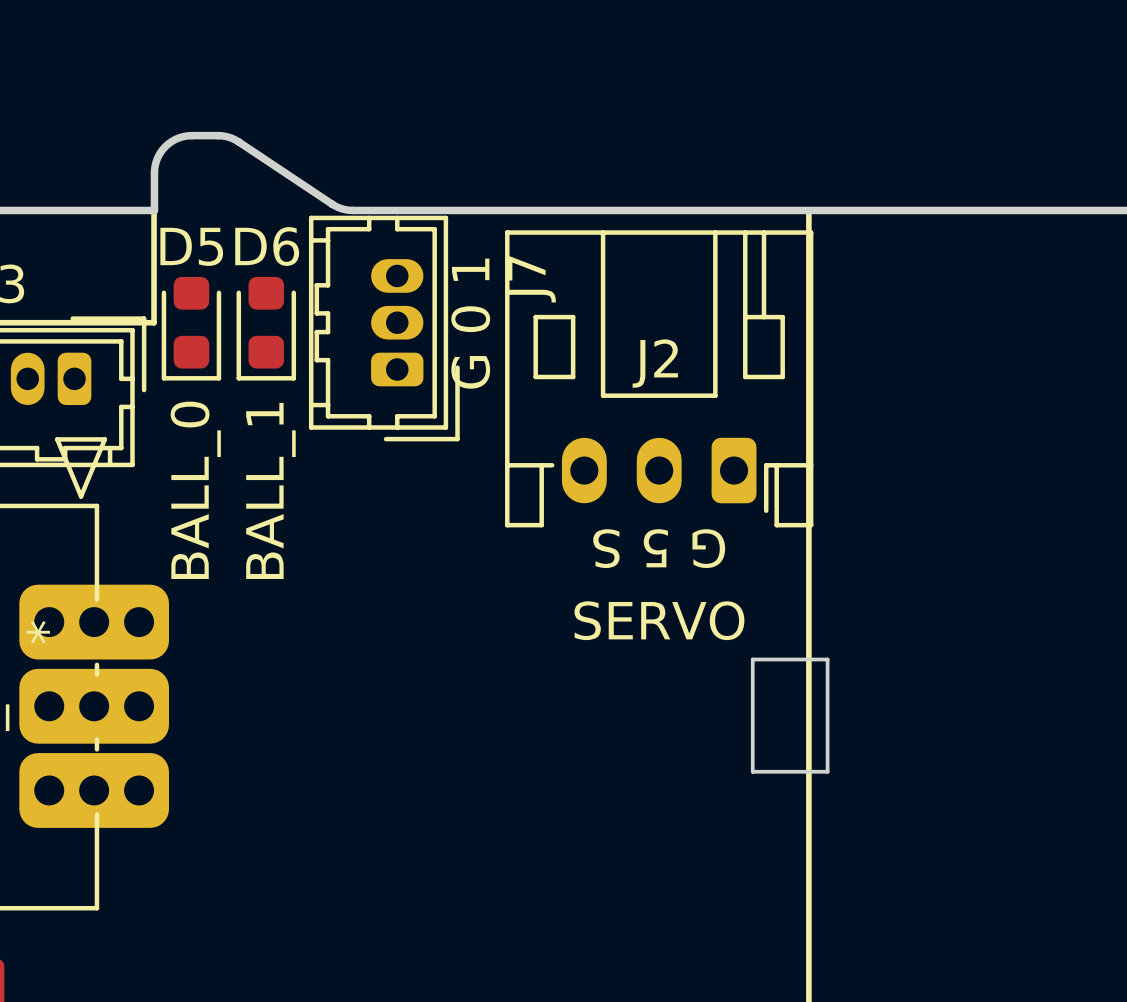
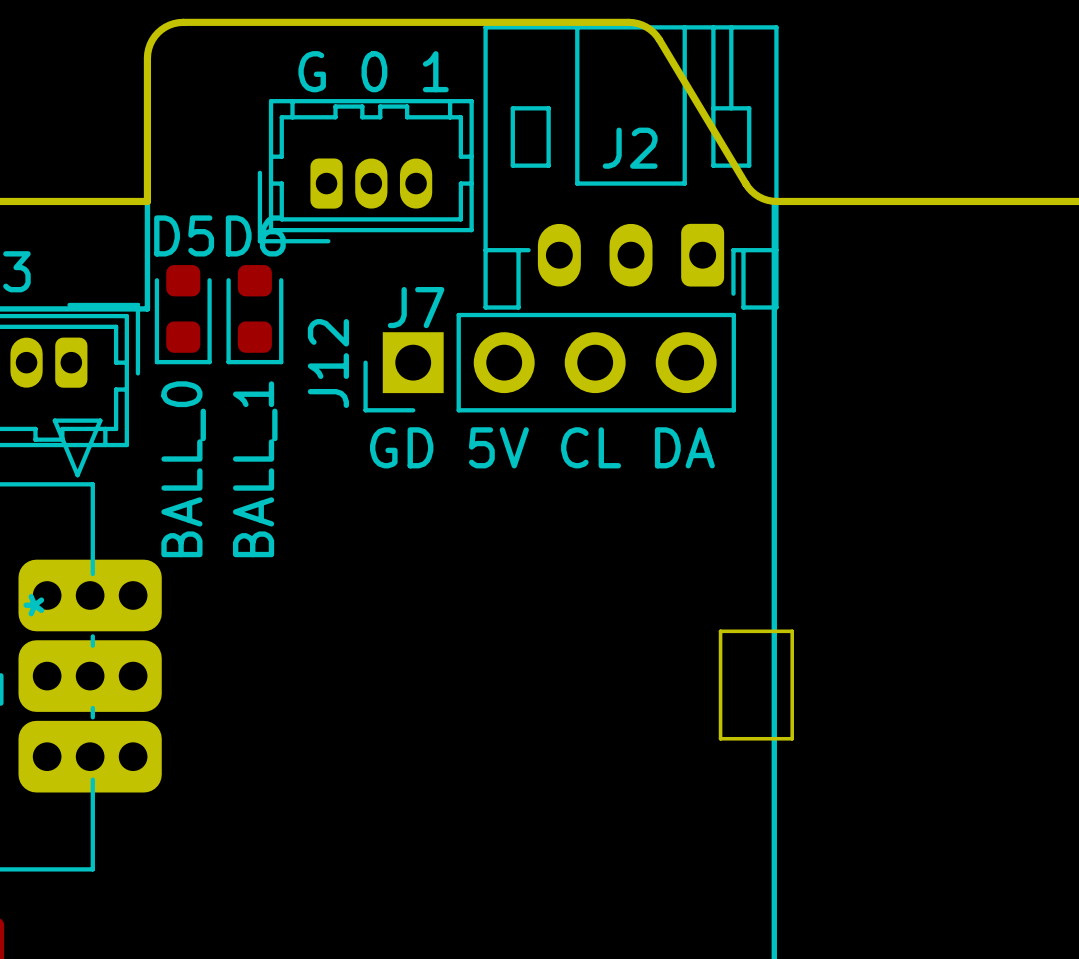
board edge: (154, 210) (154, 168) (158, 156) (171, 141) (191, 135) (221, 135) (235, 140) (332, 204) (349, 210) (811, 210) -> (147, 201) (148, 48) (152, 40) (161, 29) (169, 25) (183, 22) (637, 23) (650, 29) (659, 39) (748, 187) (763, 198) (776, 201)
text rotation: 0° (470, 323) -> 90° clockwise (373, 71)
text position: G 0 1 (470, 323) -> G 0 1 (373, 71)
J7 rotation: 0° (384, 328) -> 90° clockwise (365, 171)
J7 position: (384, 328) -> (365, 171)
J12: none -> (549, 362)
J2 position: (659, 378) -> (631, 167)
text: none -> GD 5V CL DA (542, 447)
text: G 5 S (659, 548) -> none
text: SERVO (659, 620) -> none

